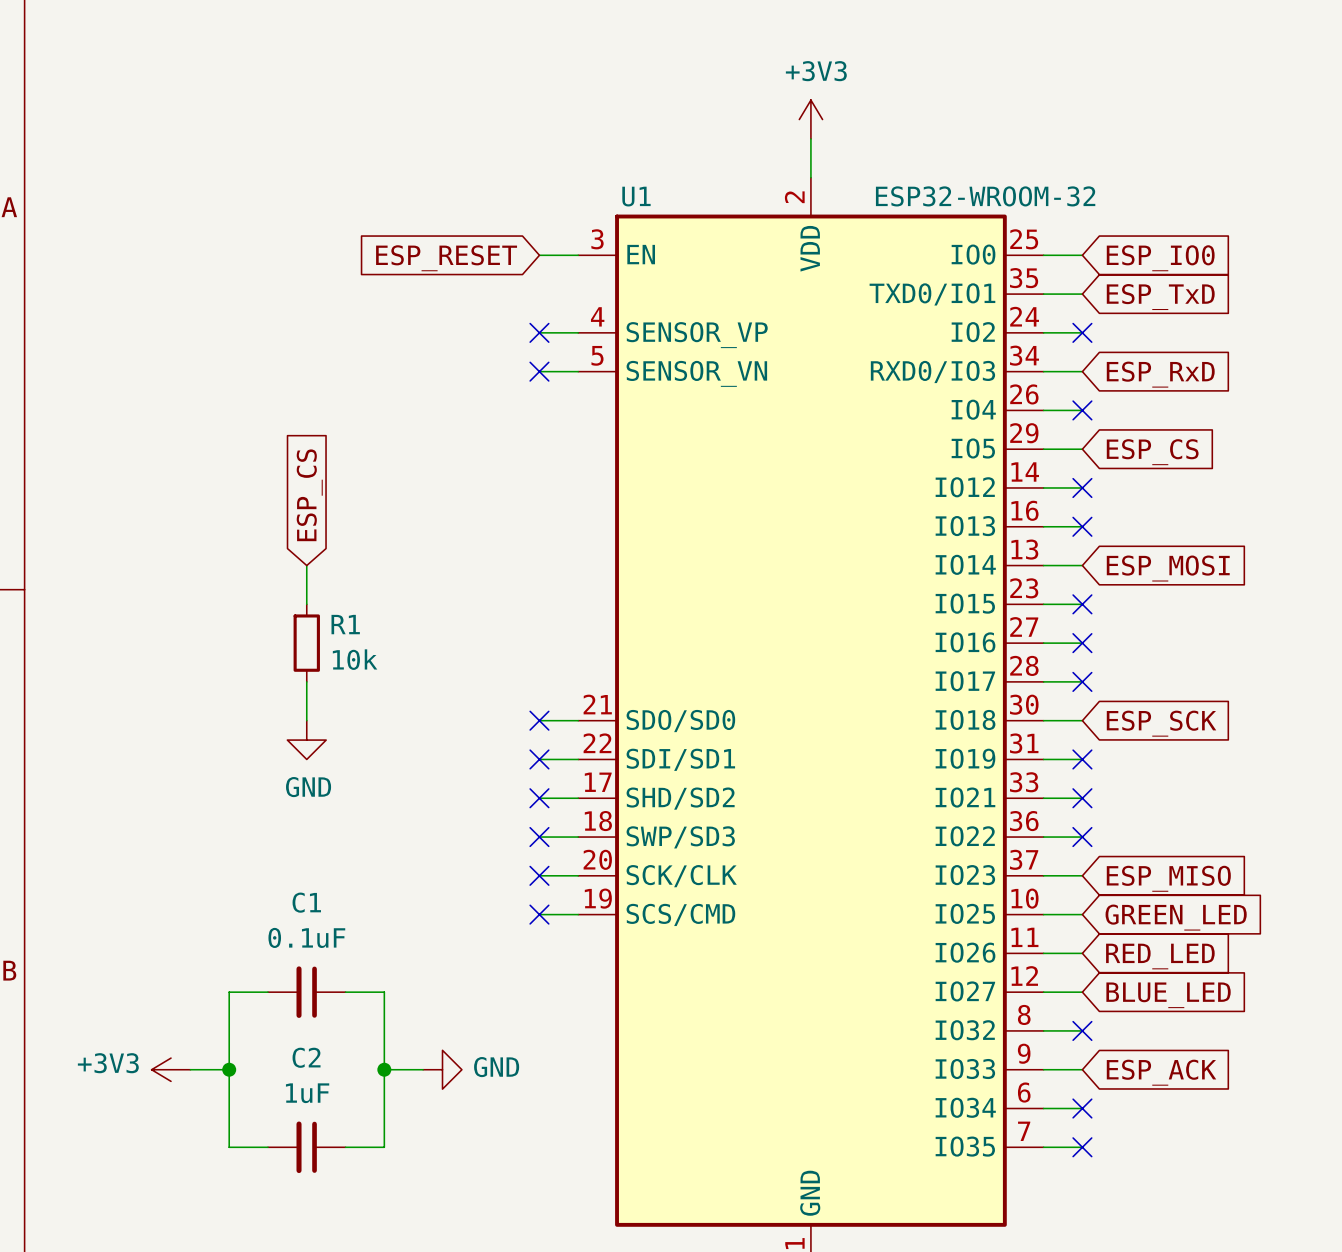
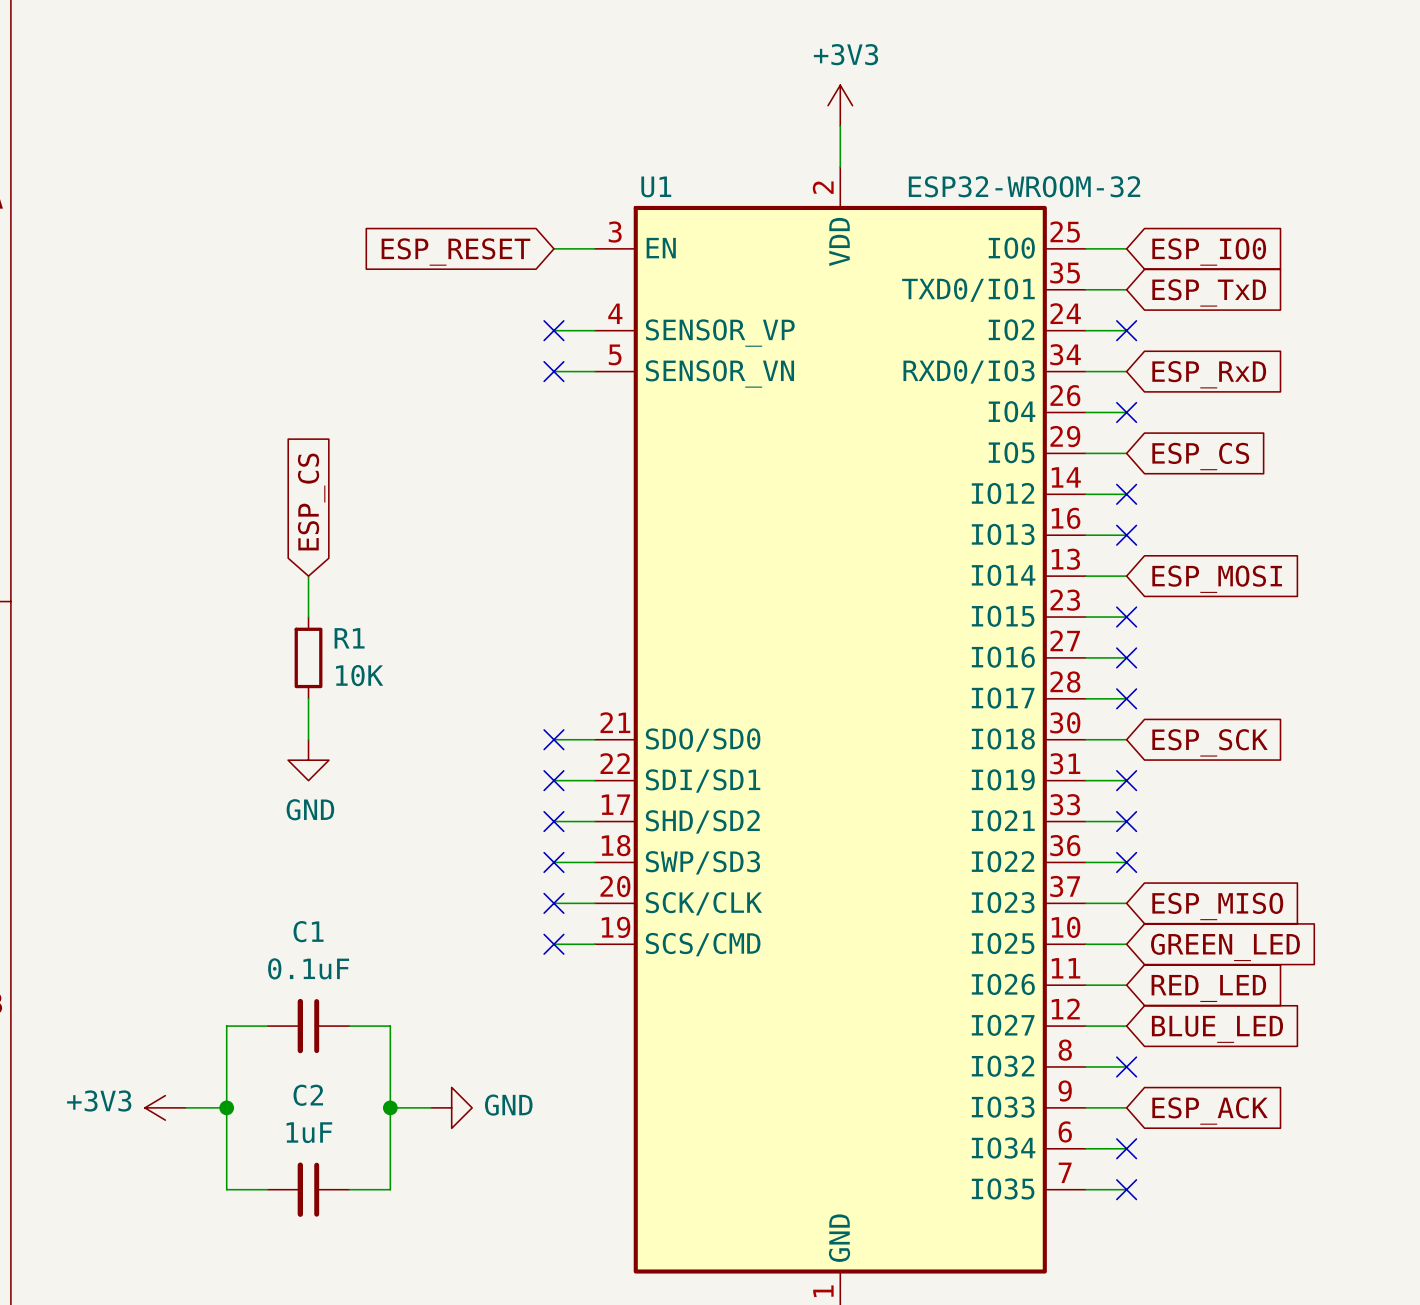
R1 value: 10k (355, 659) -> 10K (359, 675)

